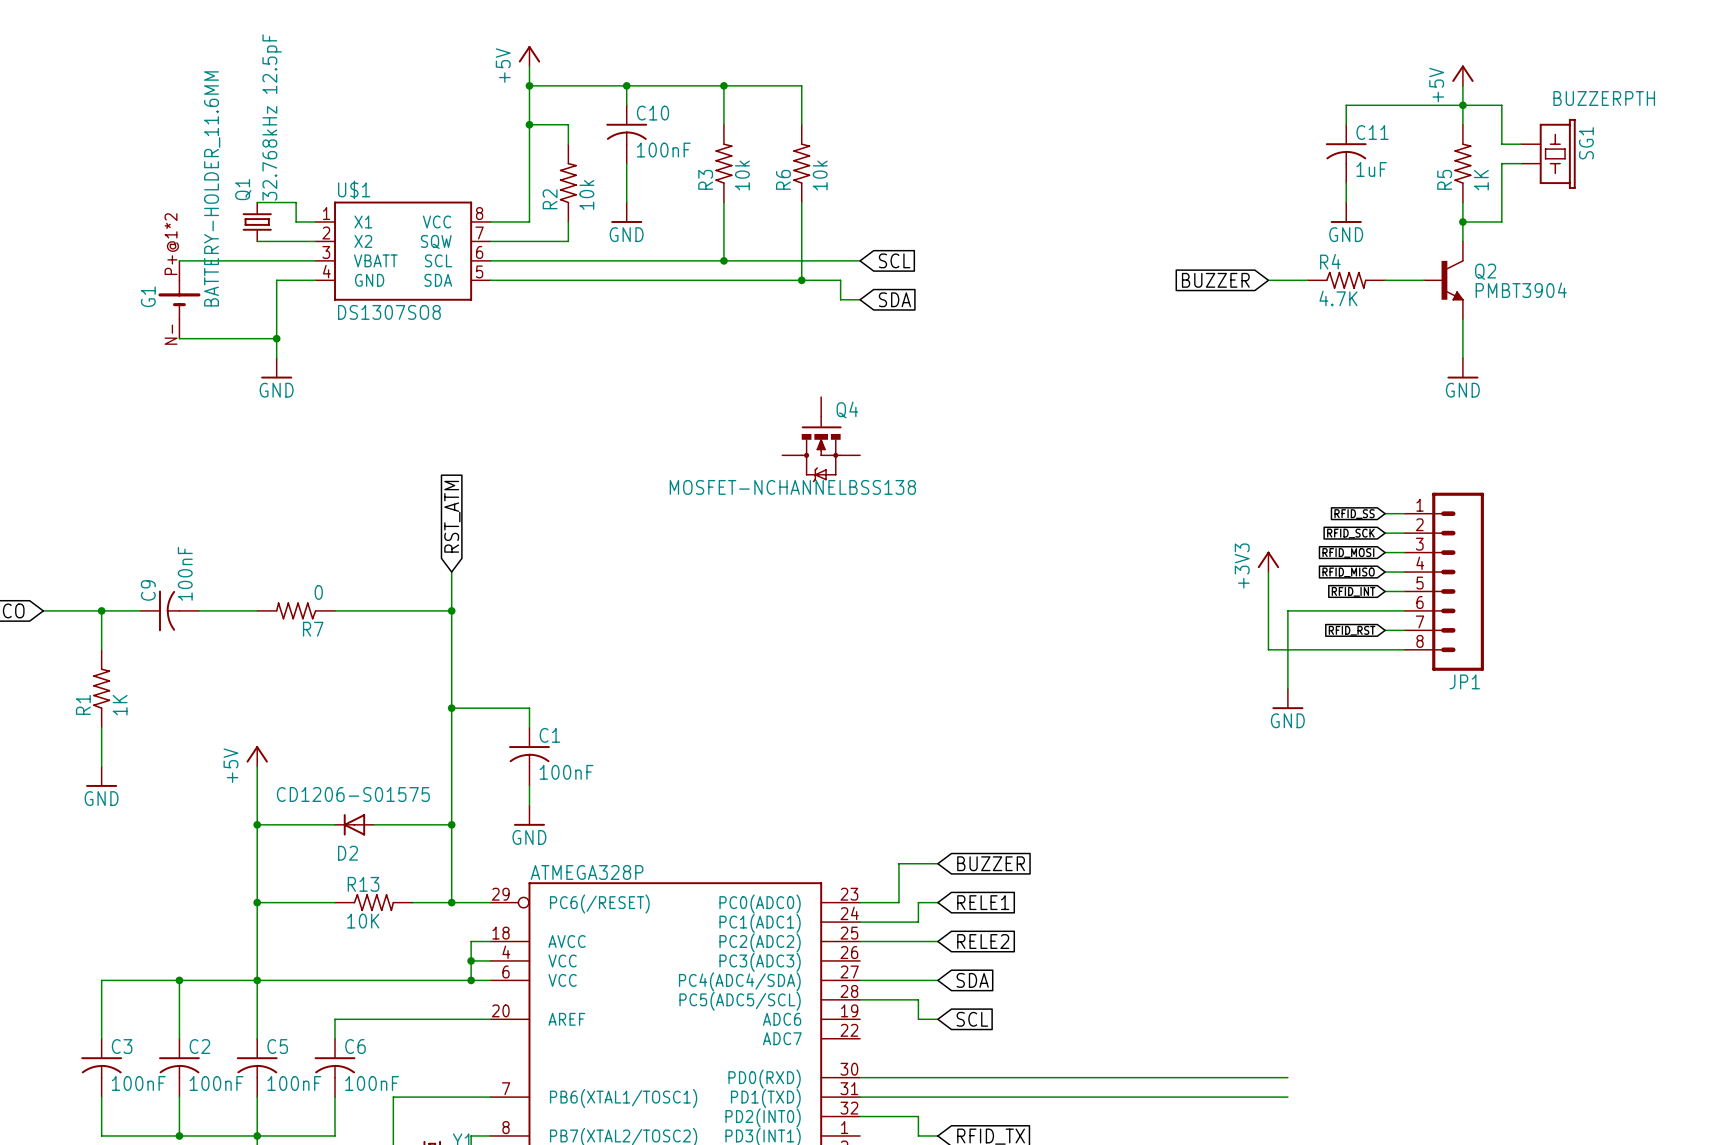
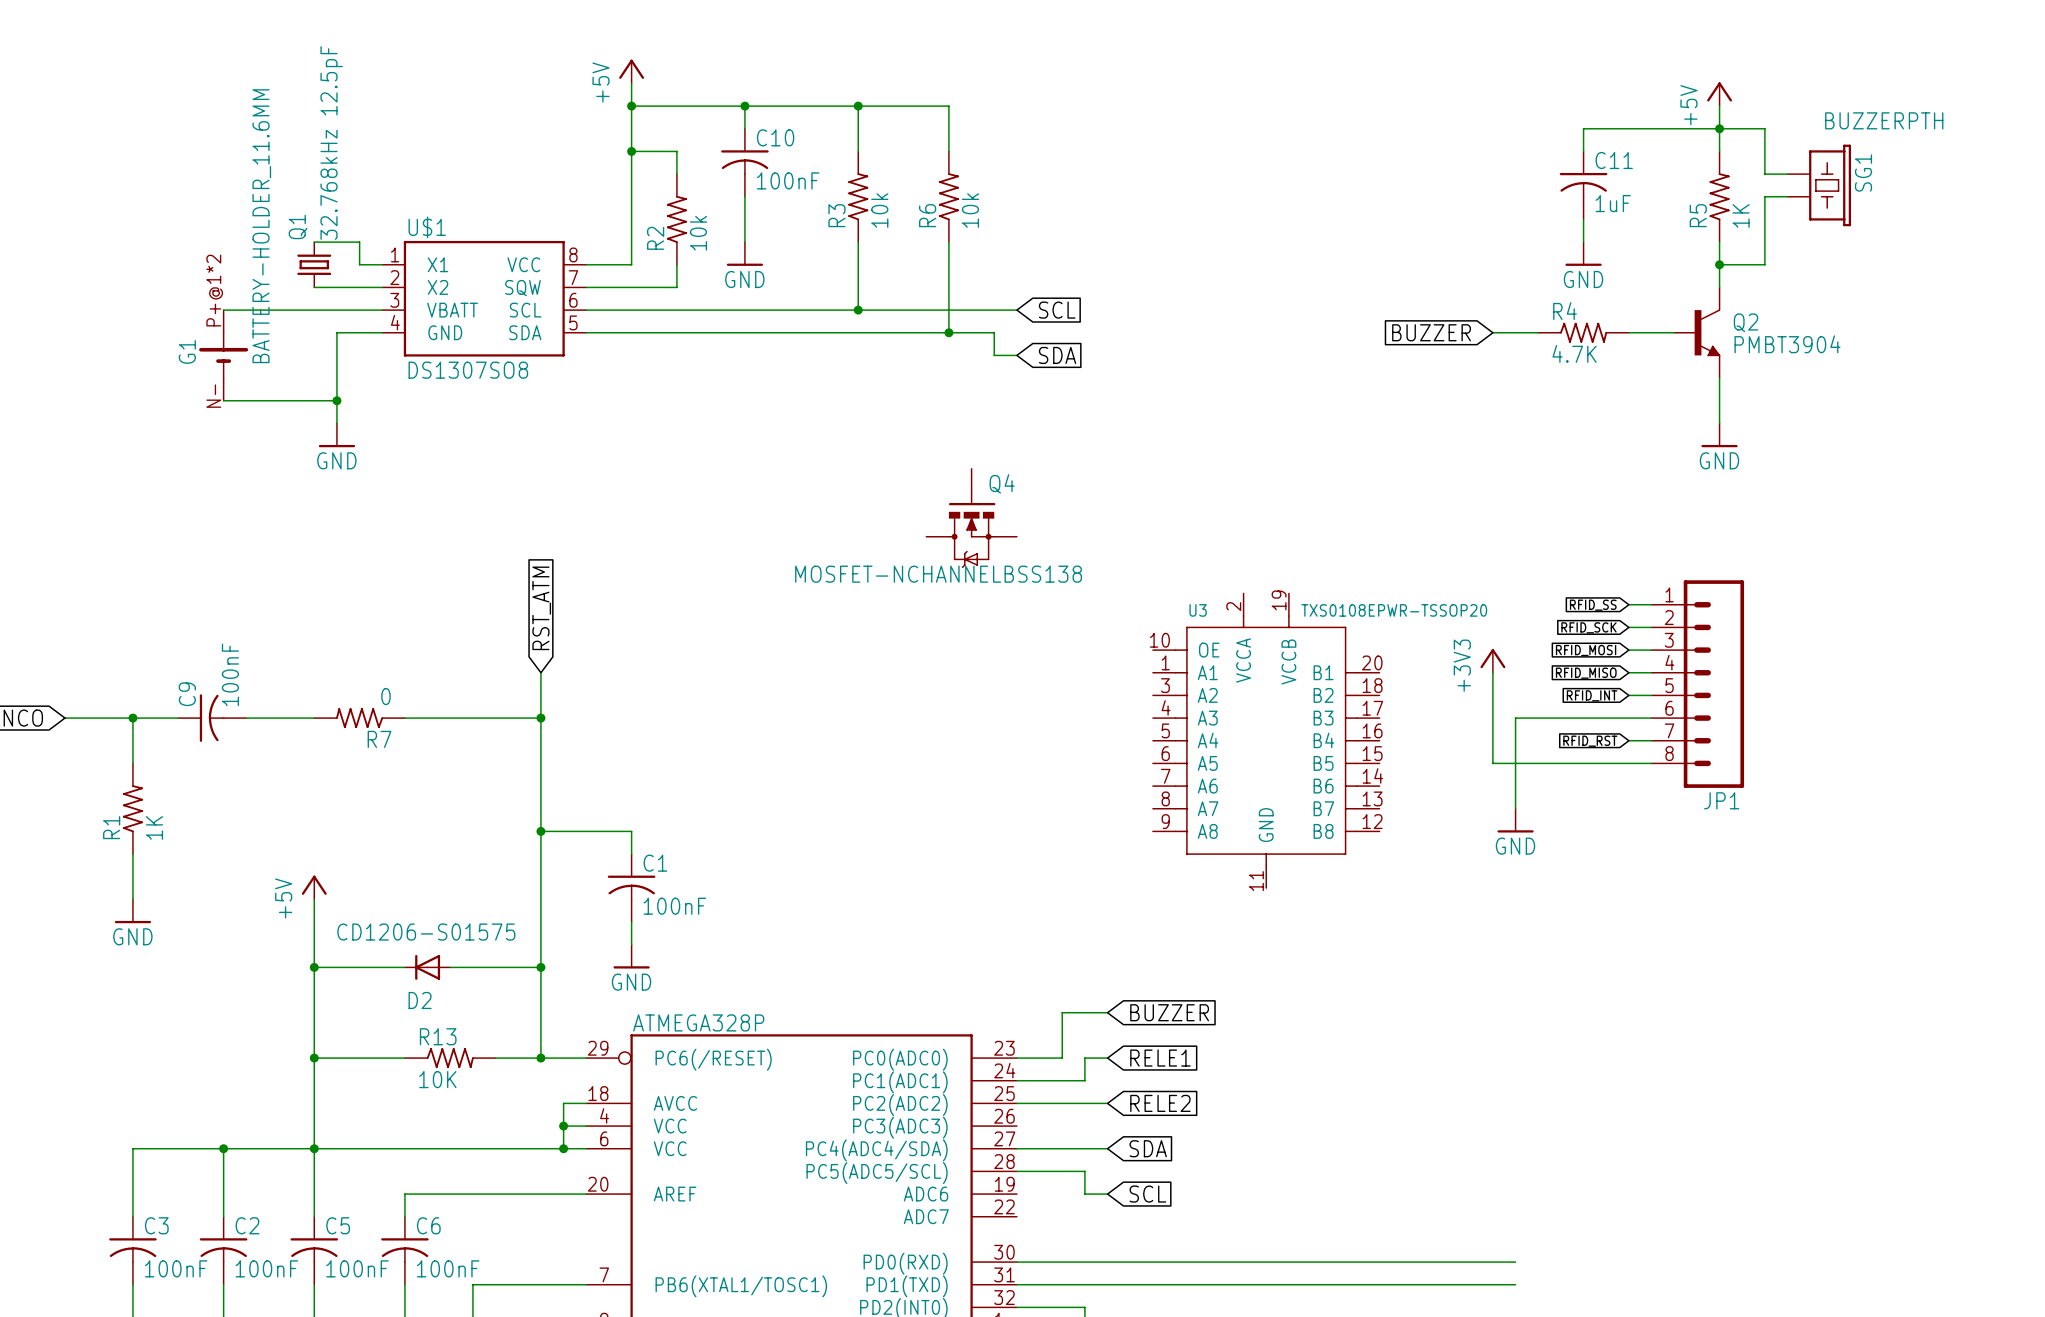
U3: none -> TXS0108EPWR-TSSOP20 (1266, 740)

